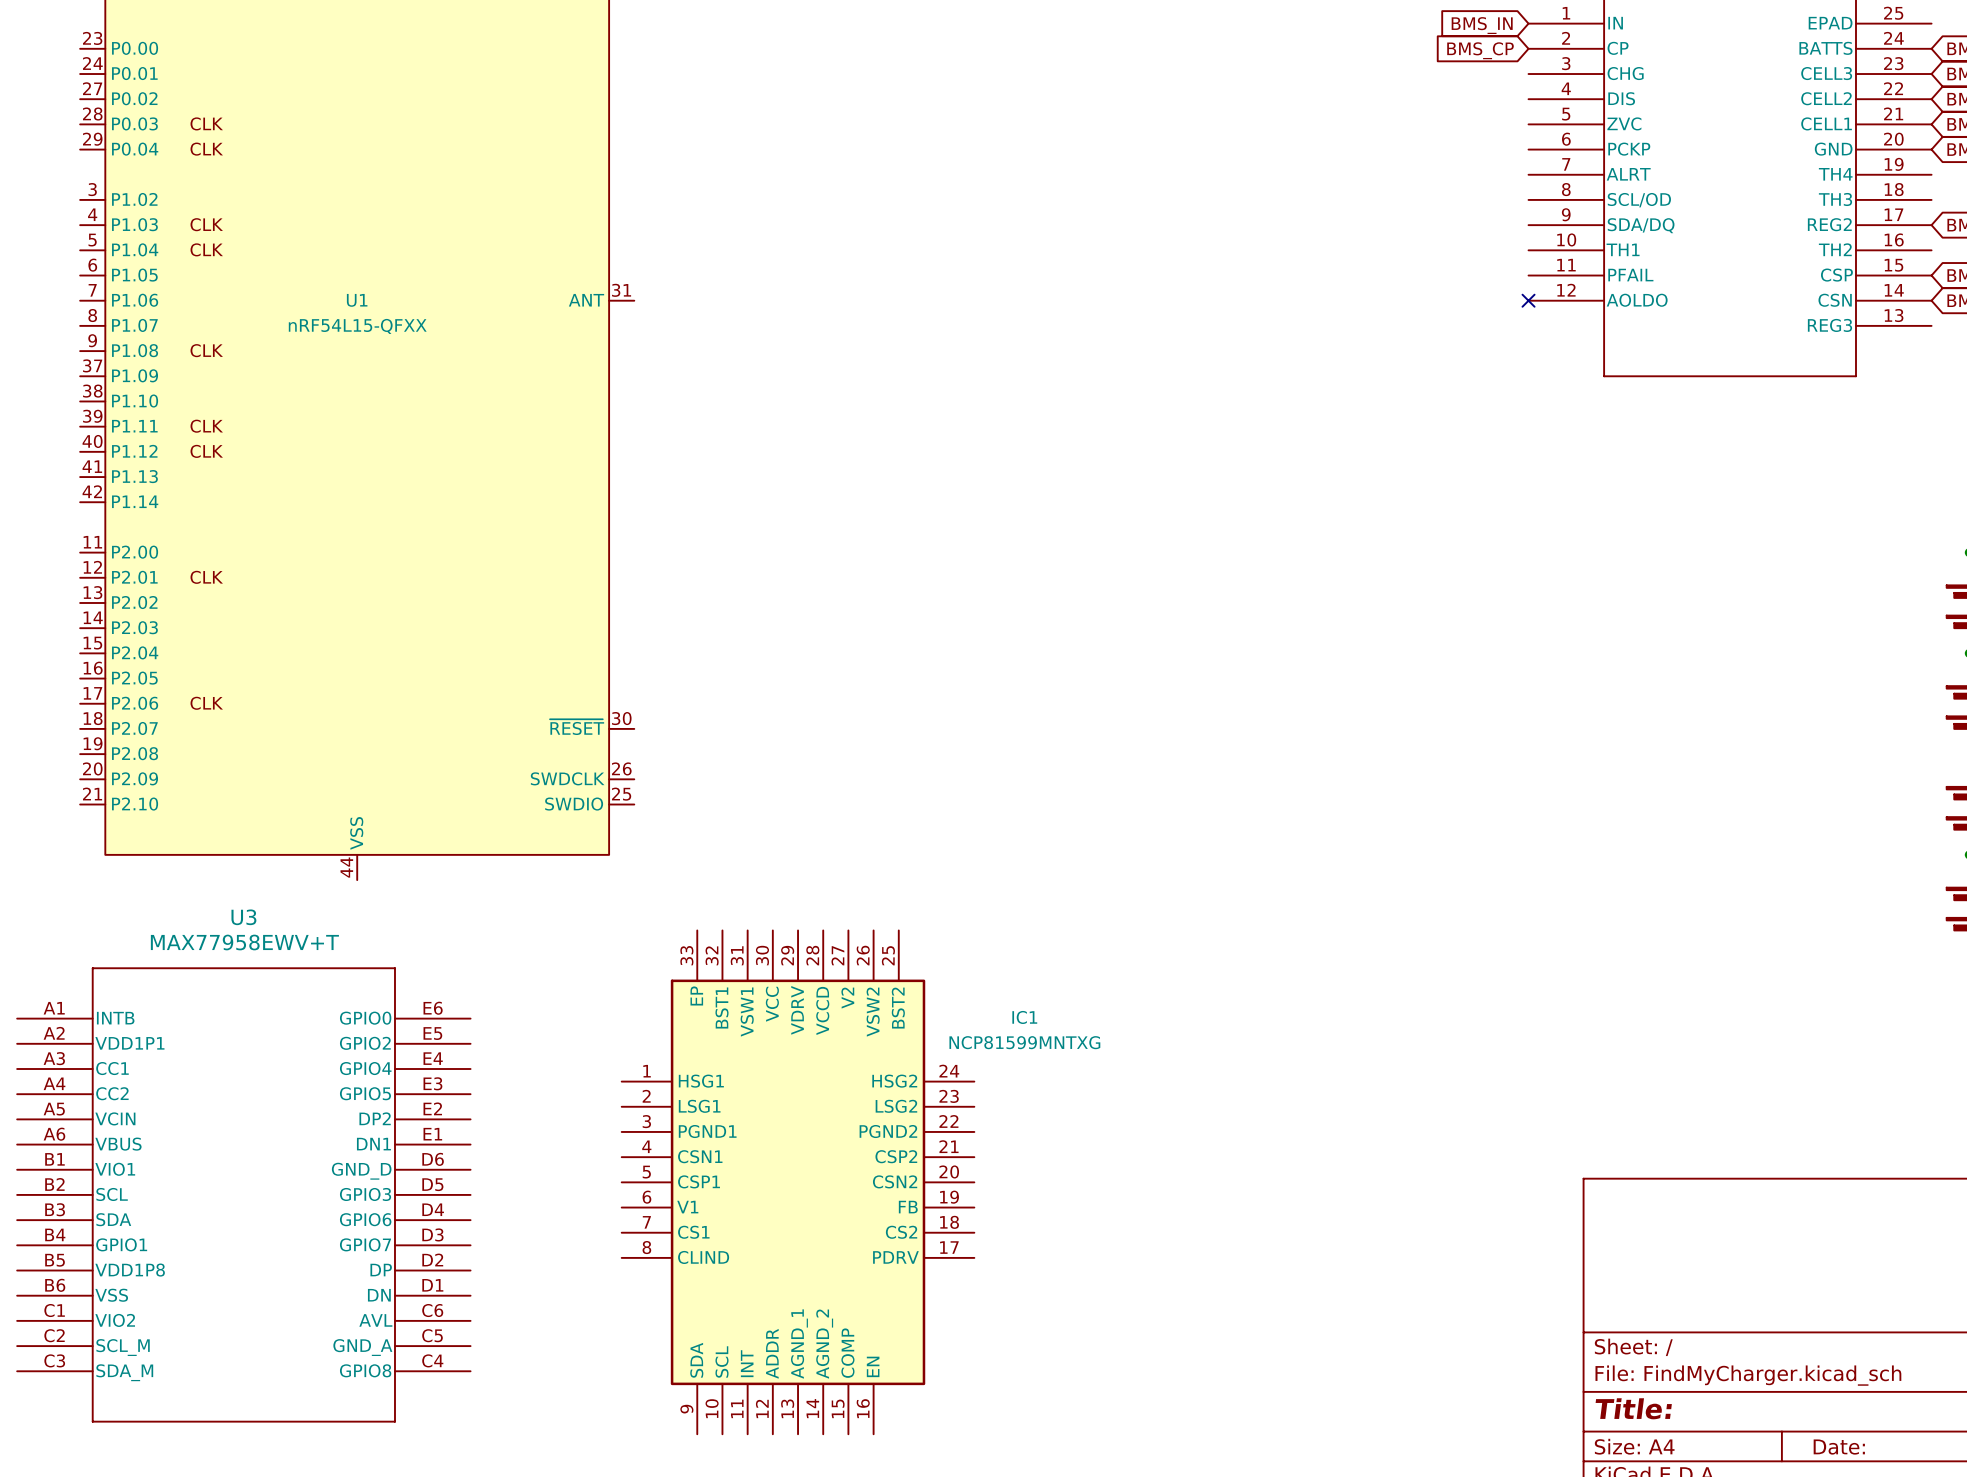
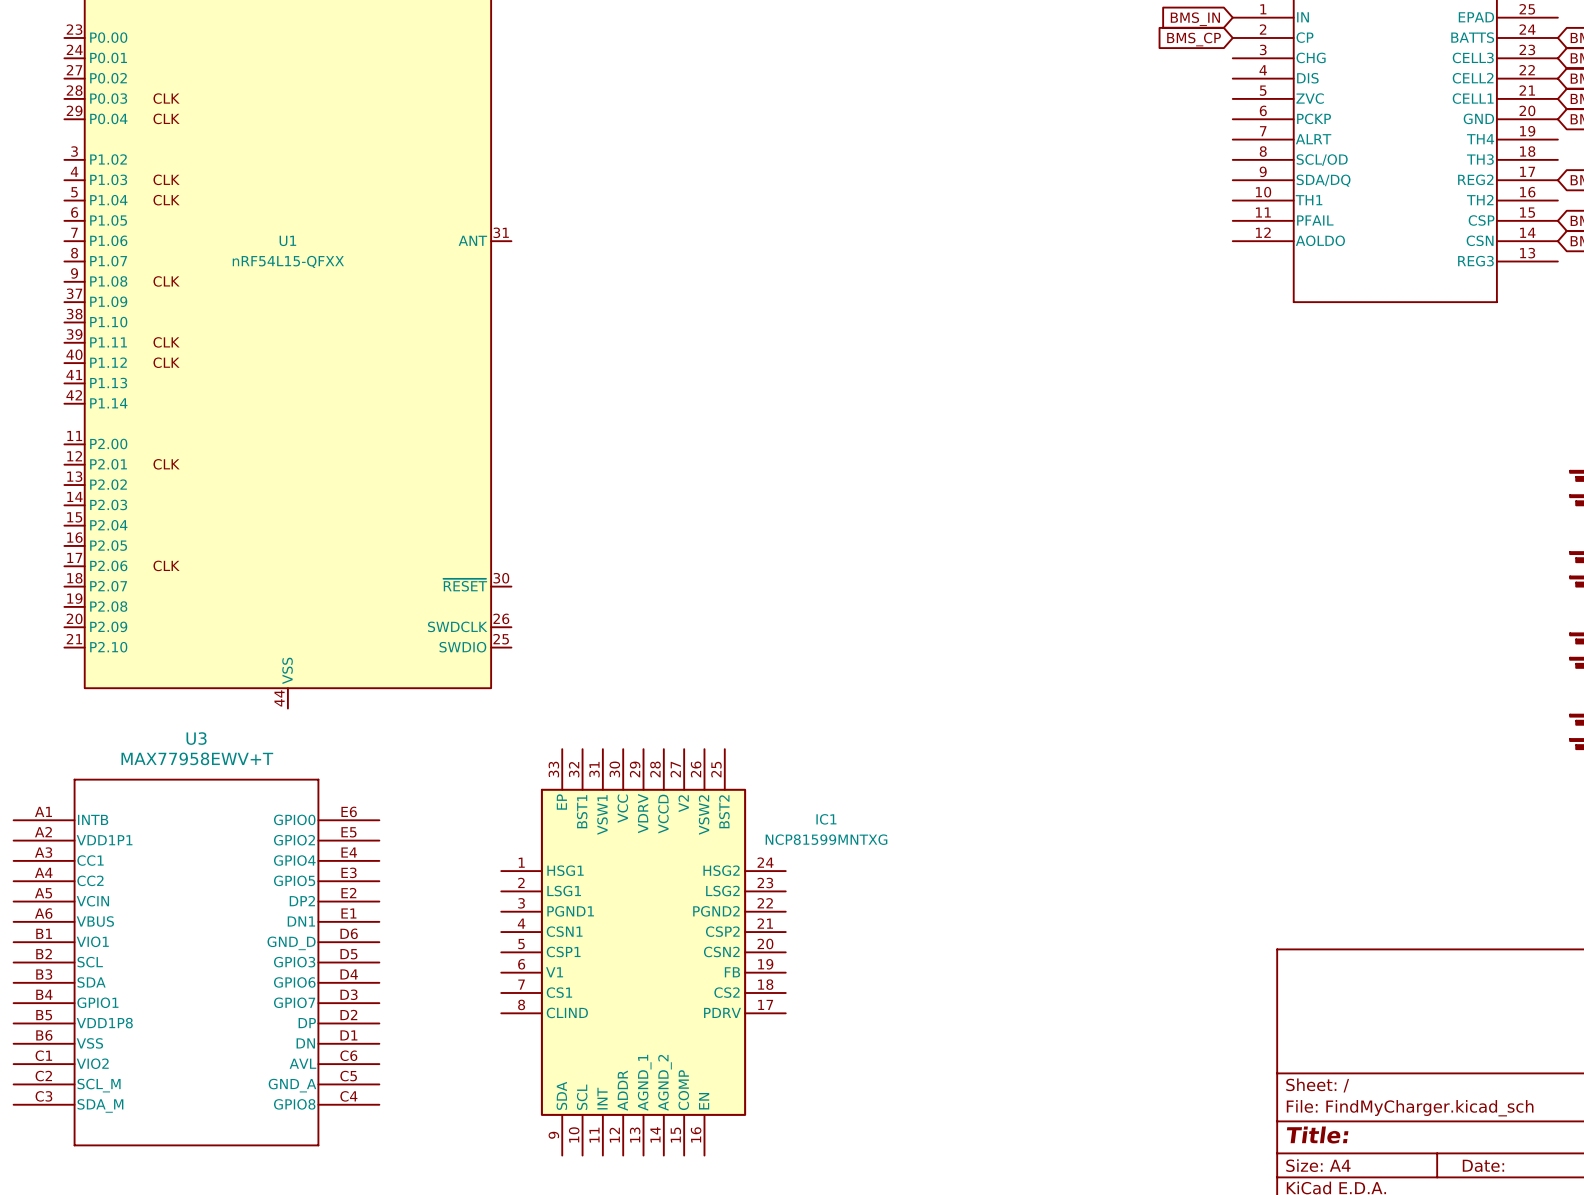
no-connect mark: (1528, 300) -> none

